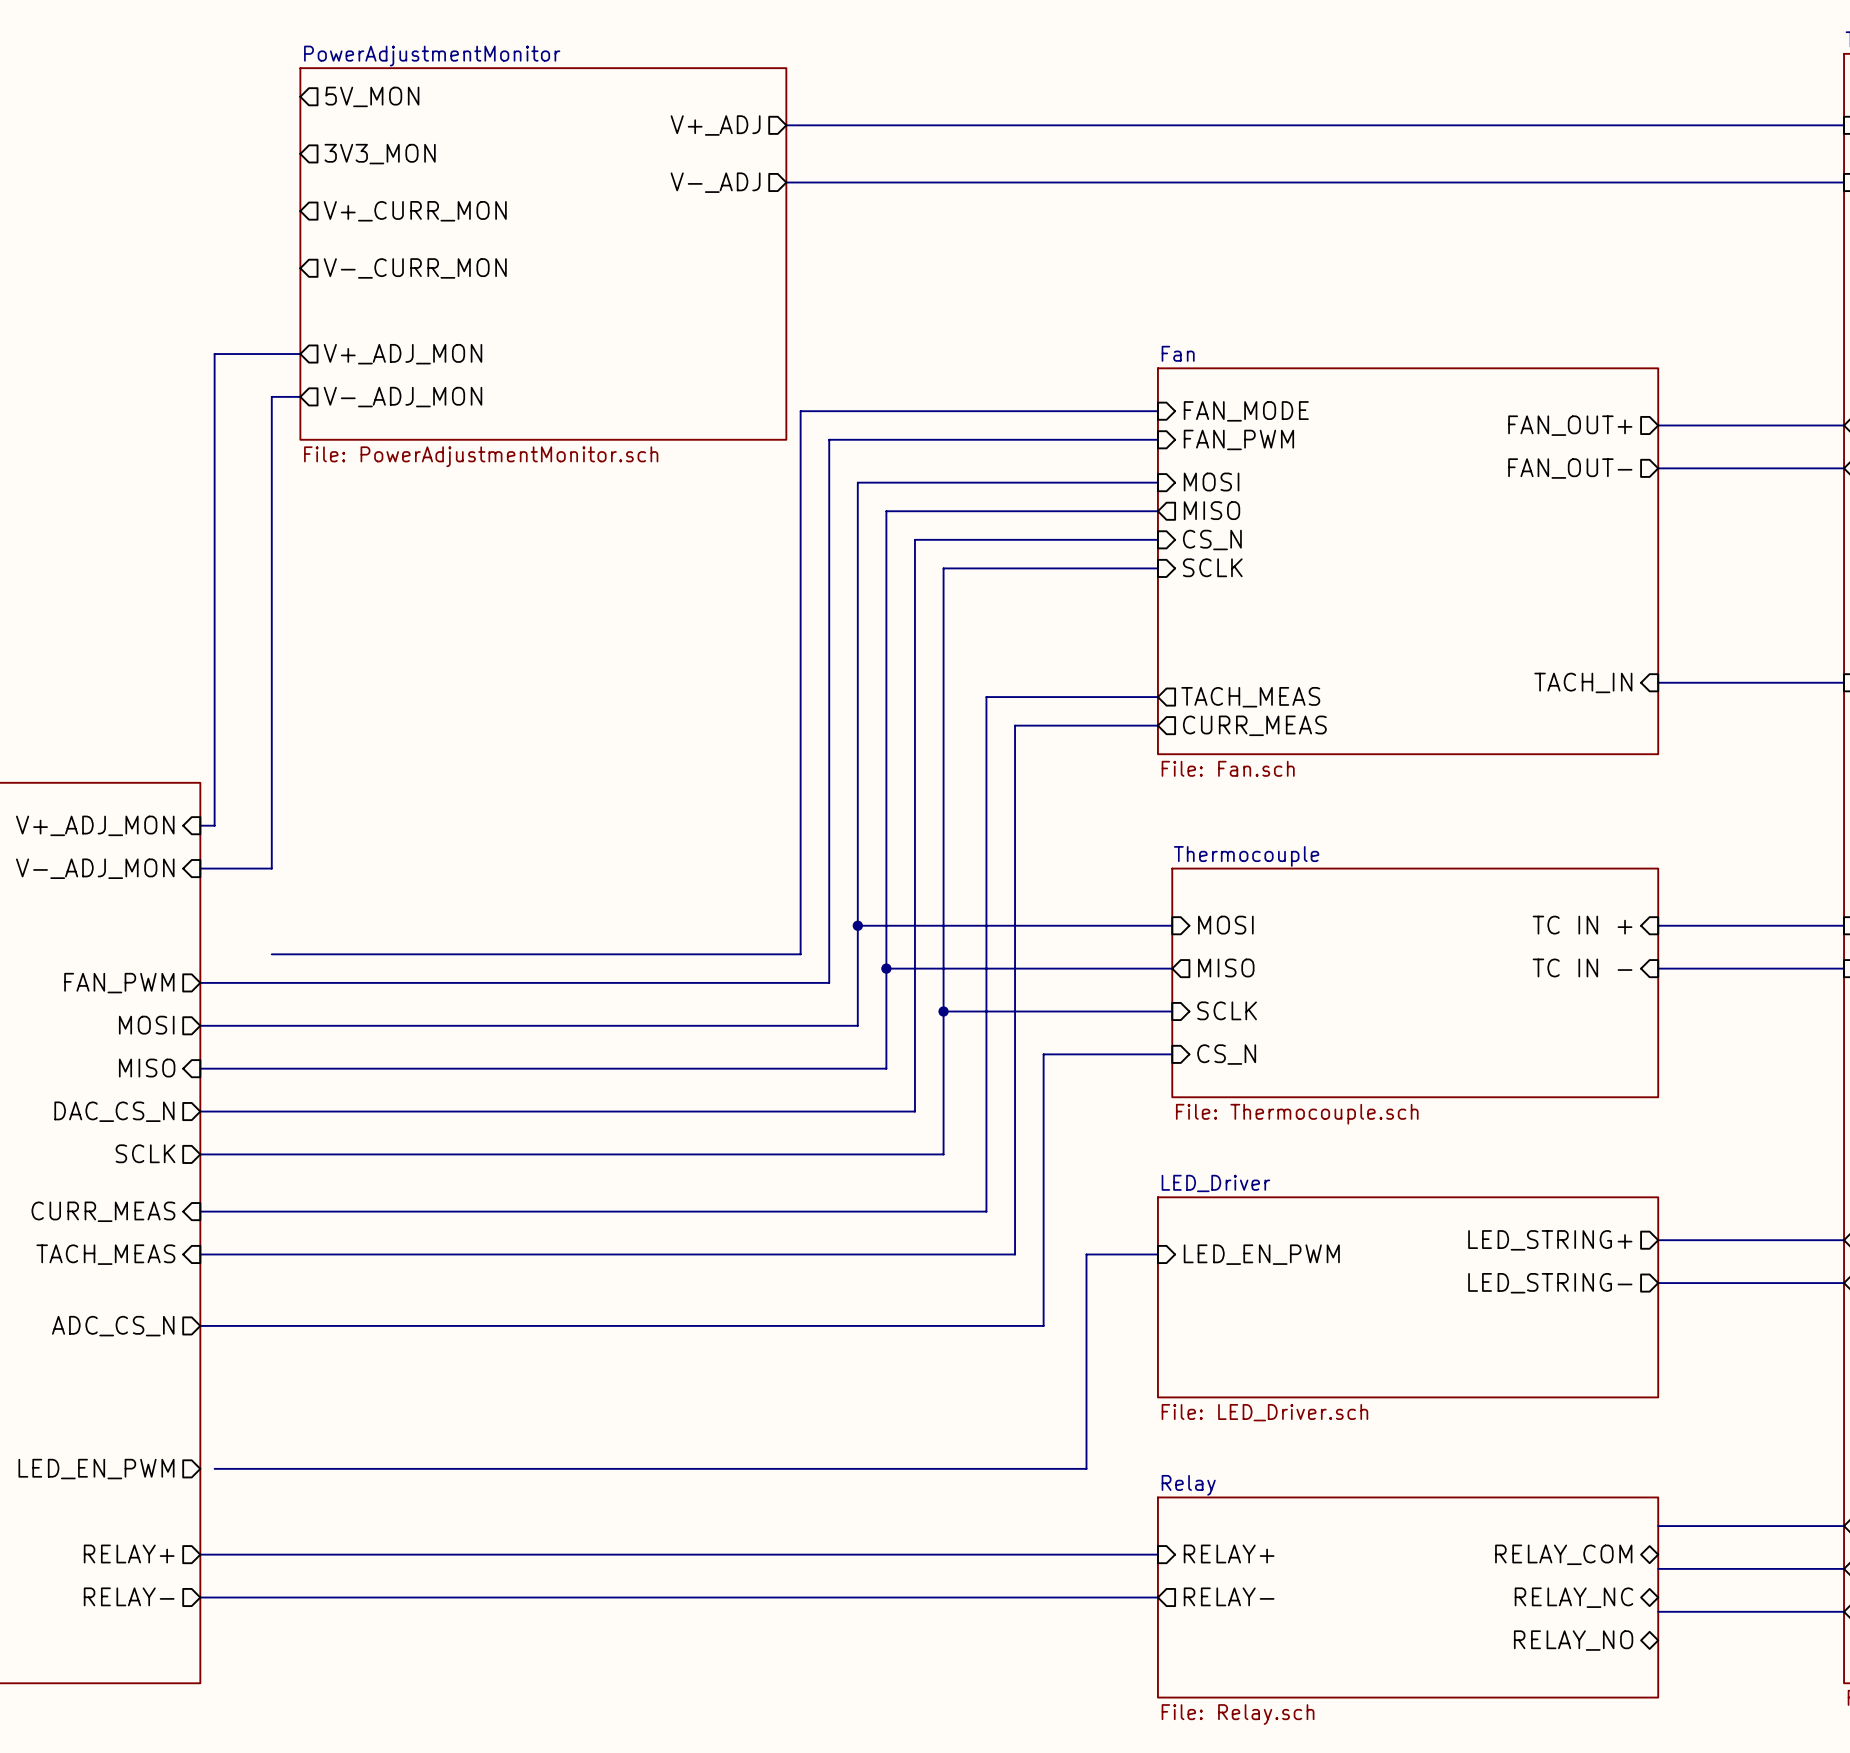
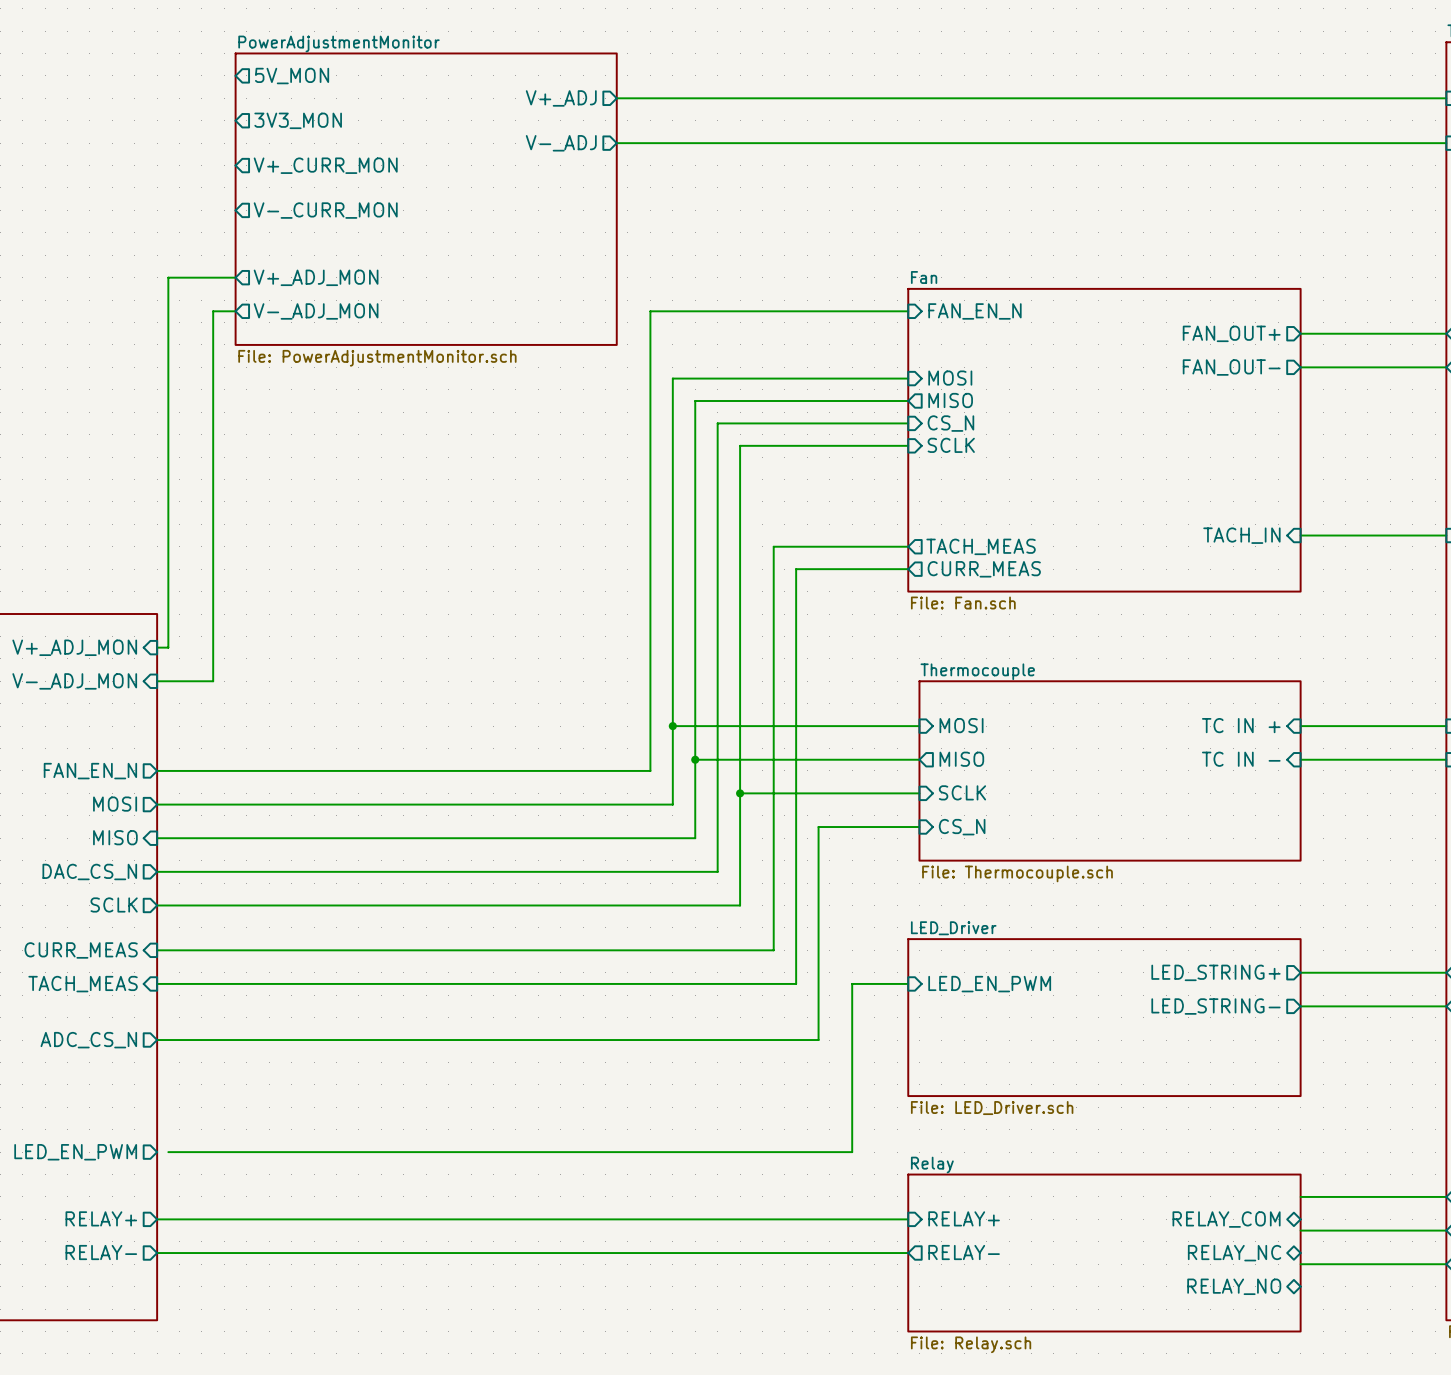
wire: (1157, 411) (800, 411) (800, 954) (271, 954) -> none
sheet pin: FAN_MODE (1246, 411) -> FAN_EN_N (974, 311)
wire: (829, 439) (1157, 439) -> (650, 344) (650, 311) (908, 311)
sheet pin: FAN_PWM (1238, 439) -> none
sheet pin: FAN_PWM (119, 983) -> FAN_EN_N (90, 771)

